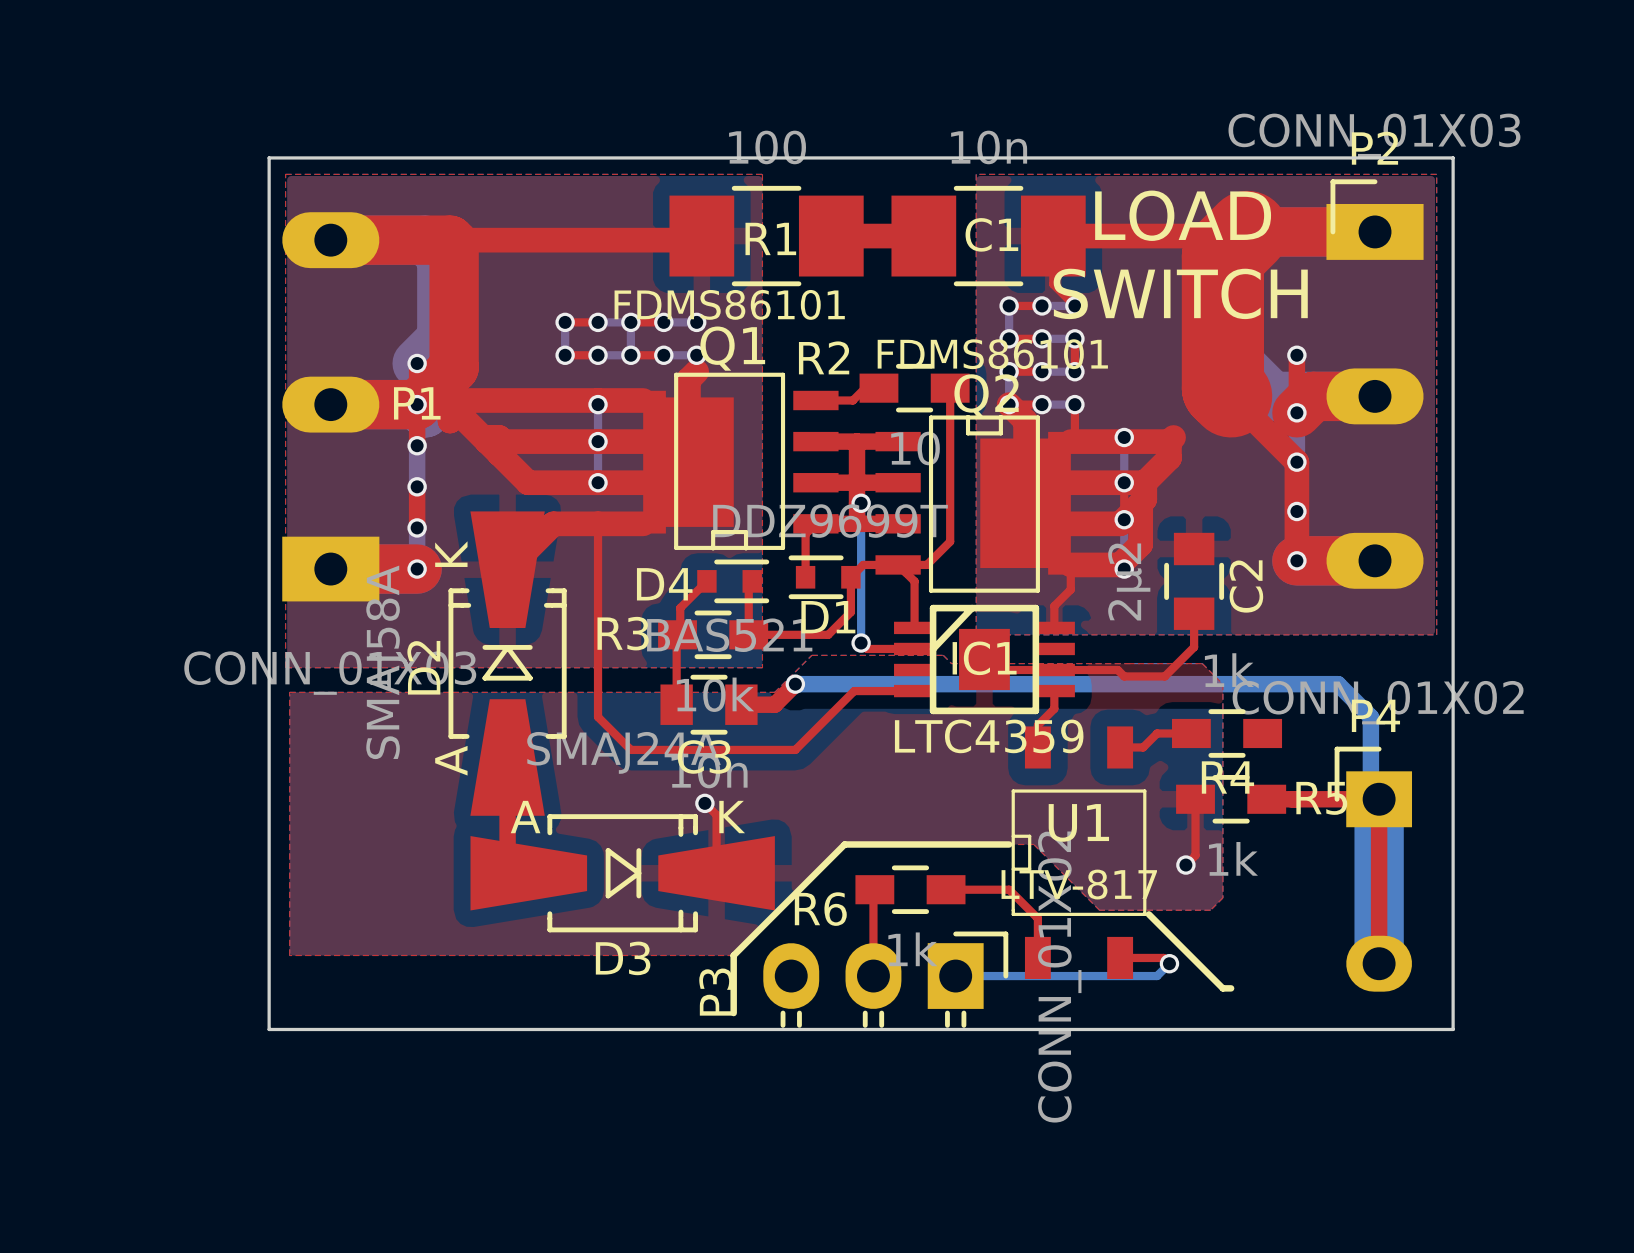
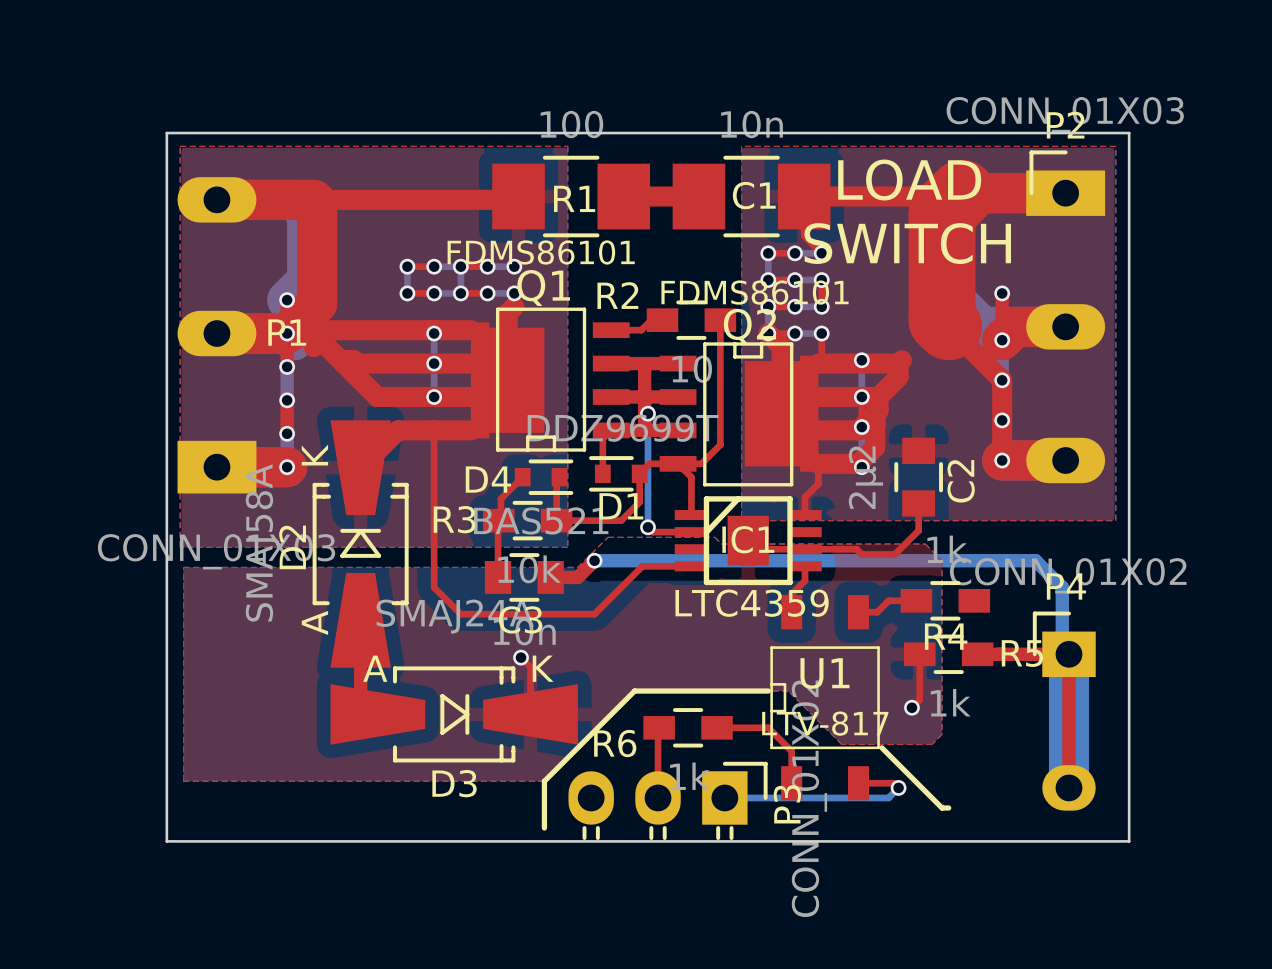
P3 name position: P3 (716, 992) -> P3 (787, 804)

